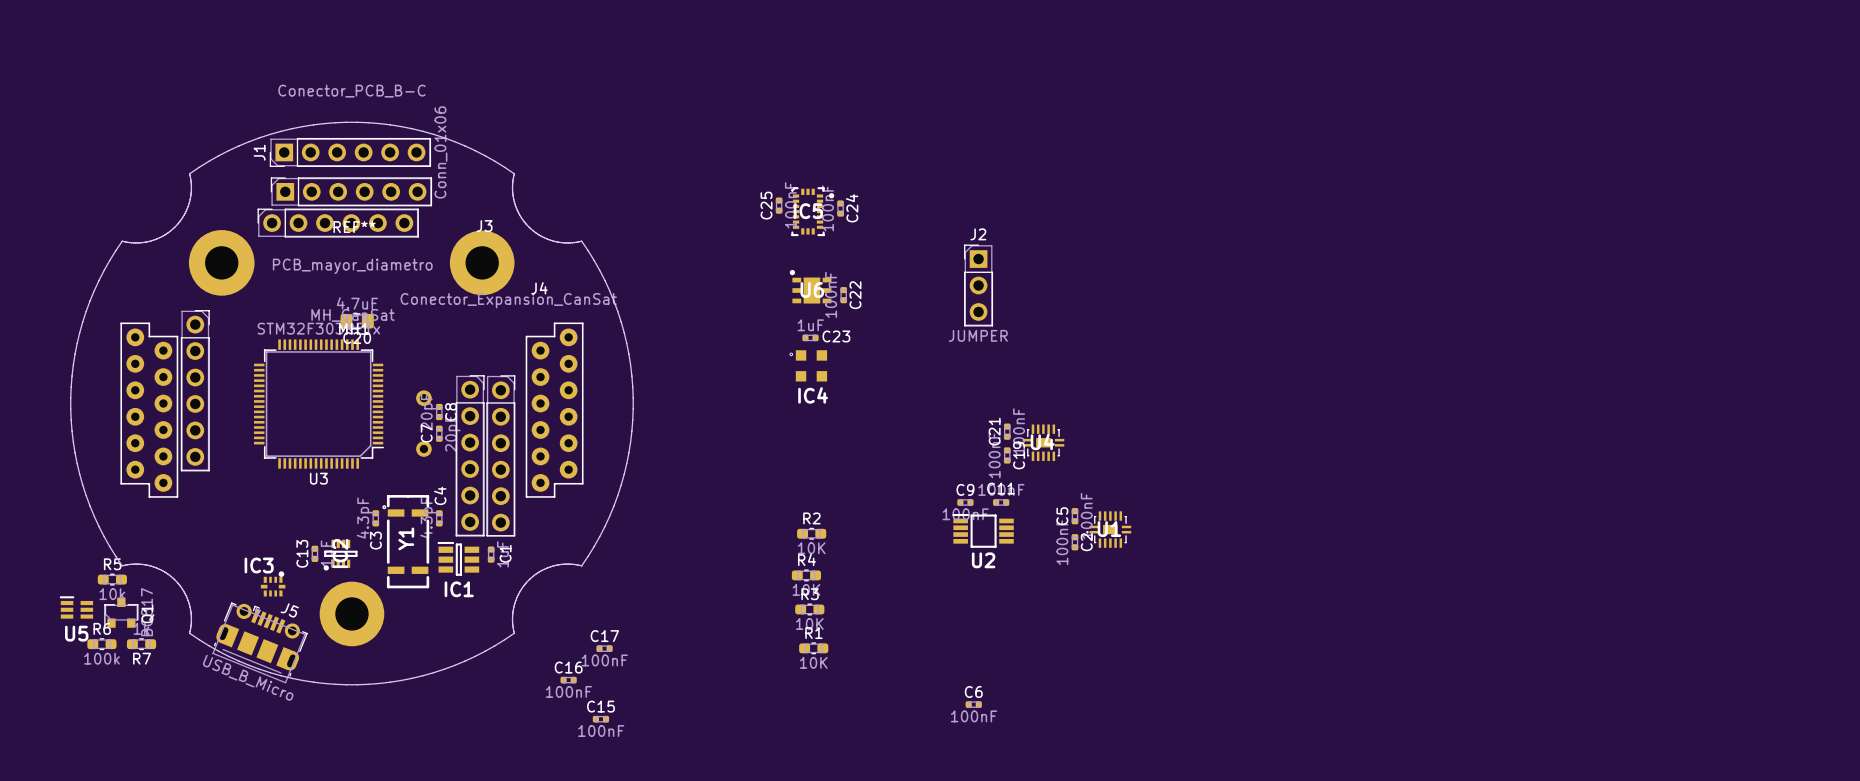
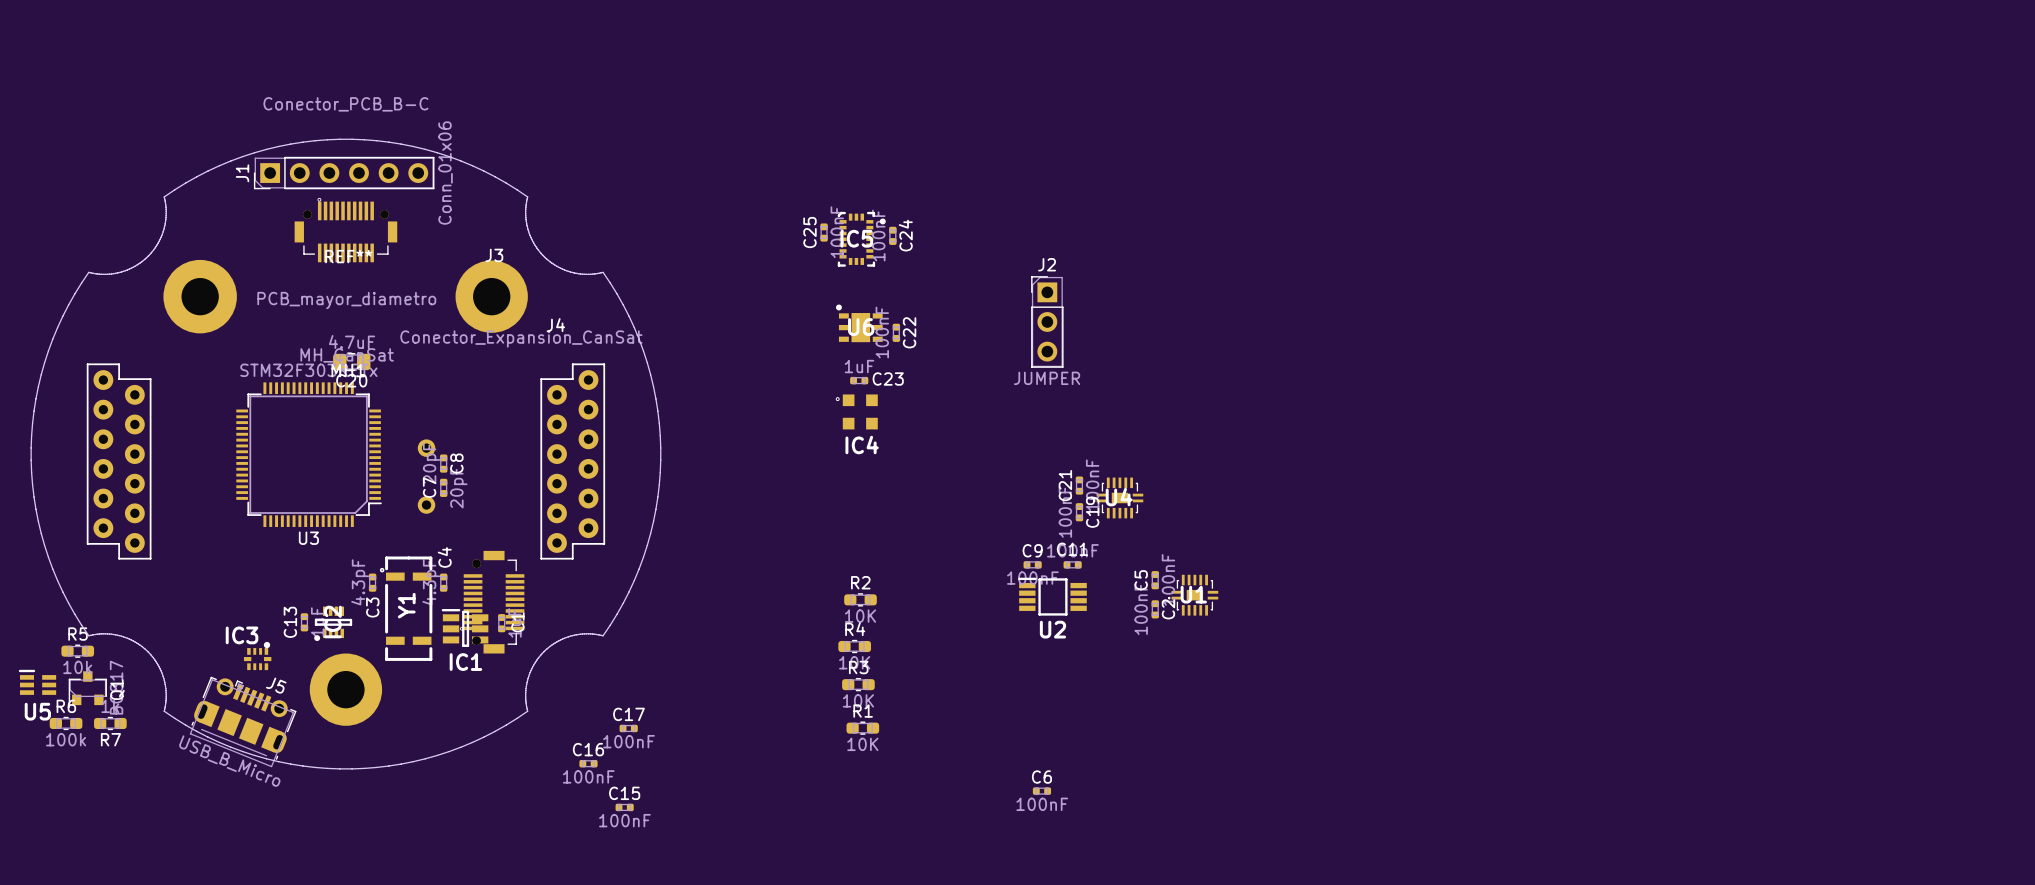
J3 footprint: [180, 177, 516, 537] -> [294, 197, 525, 654]

